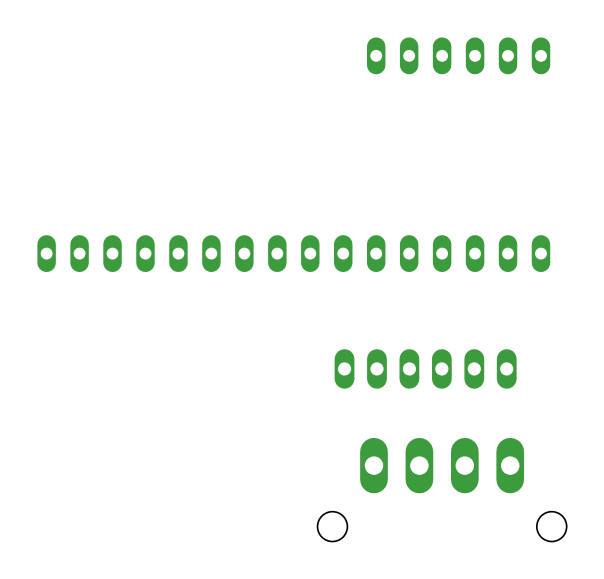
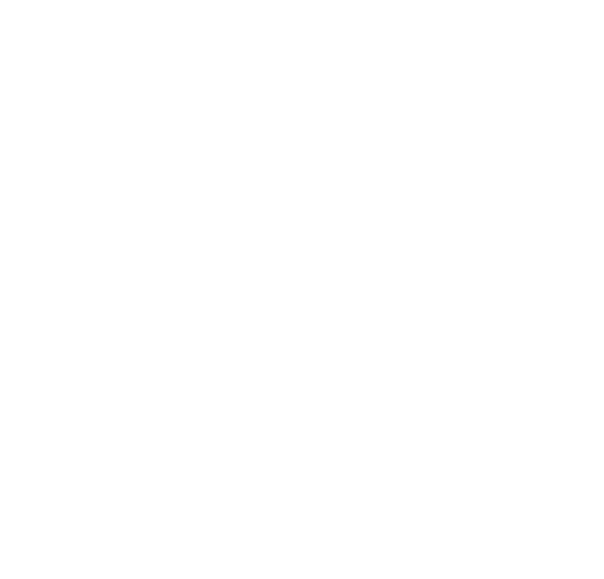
part: (458, 55) -> none
part: (293, 253) -> none
part: (425, 368) -> none
part: (442, 489) -> none

